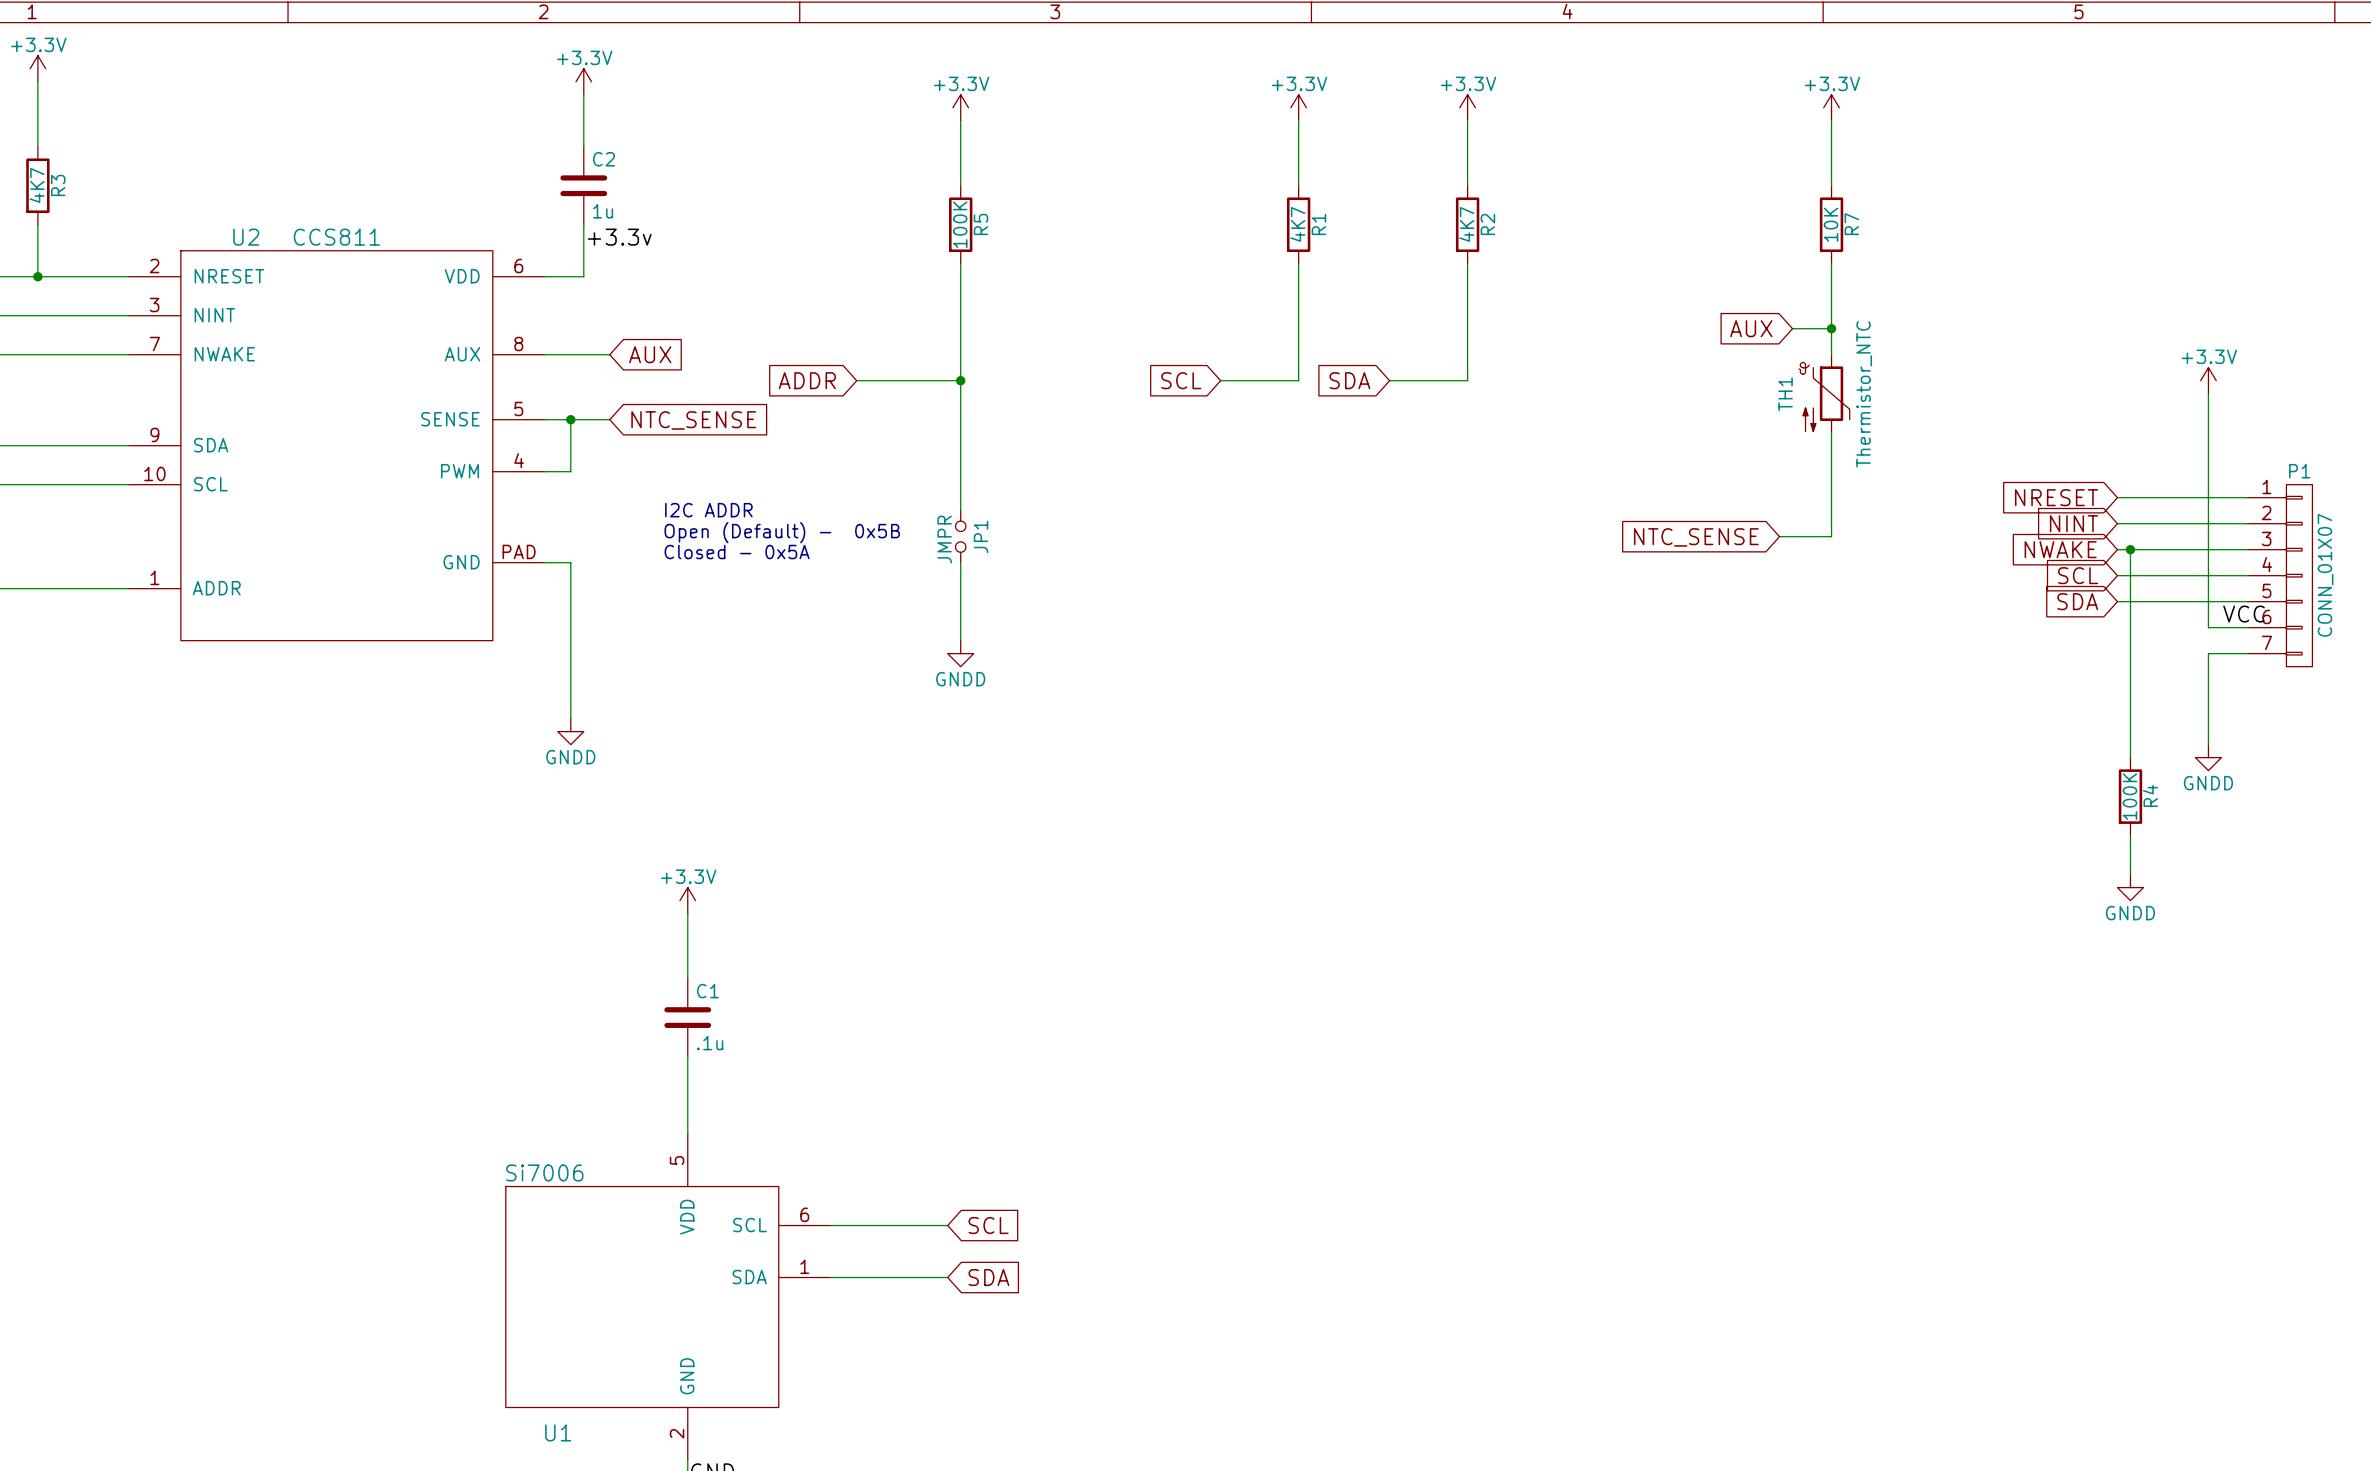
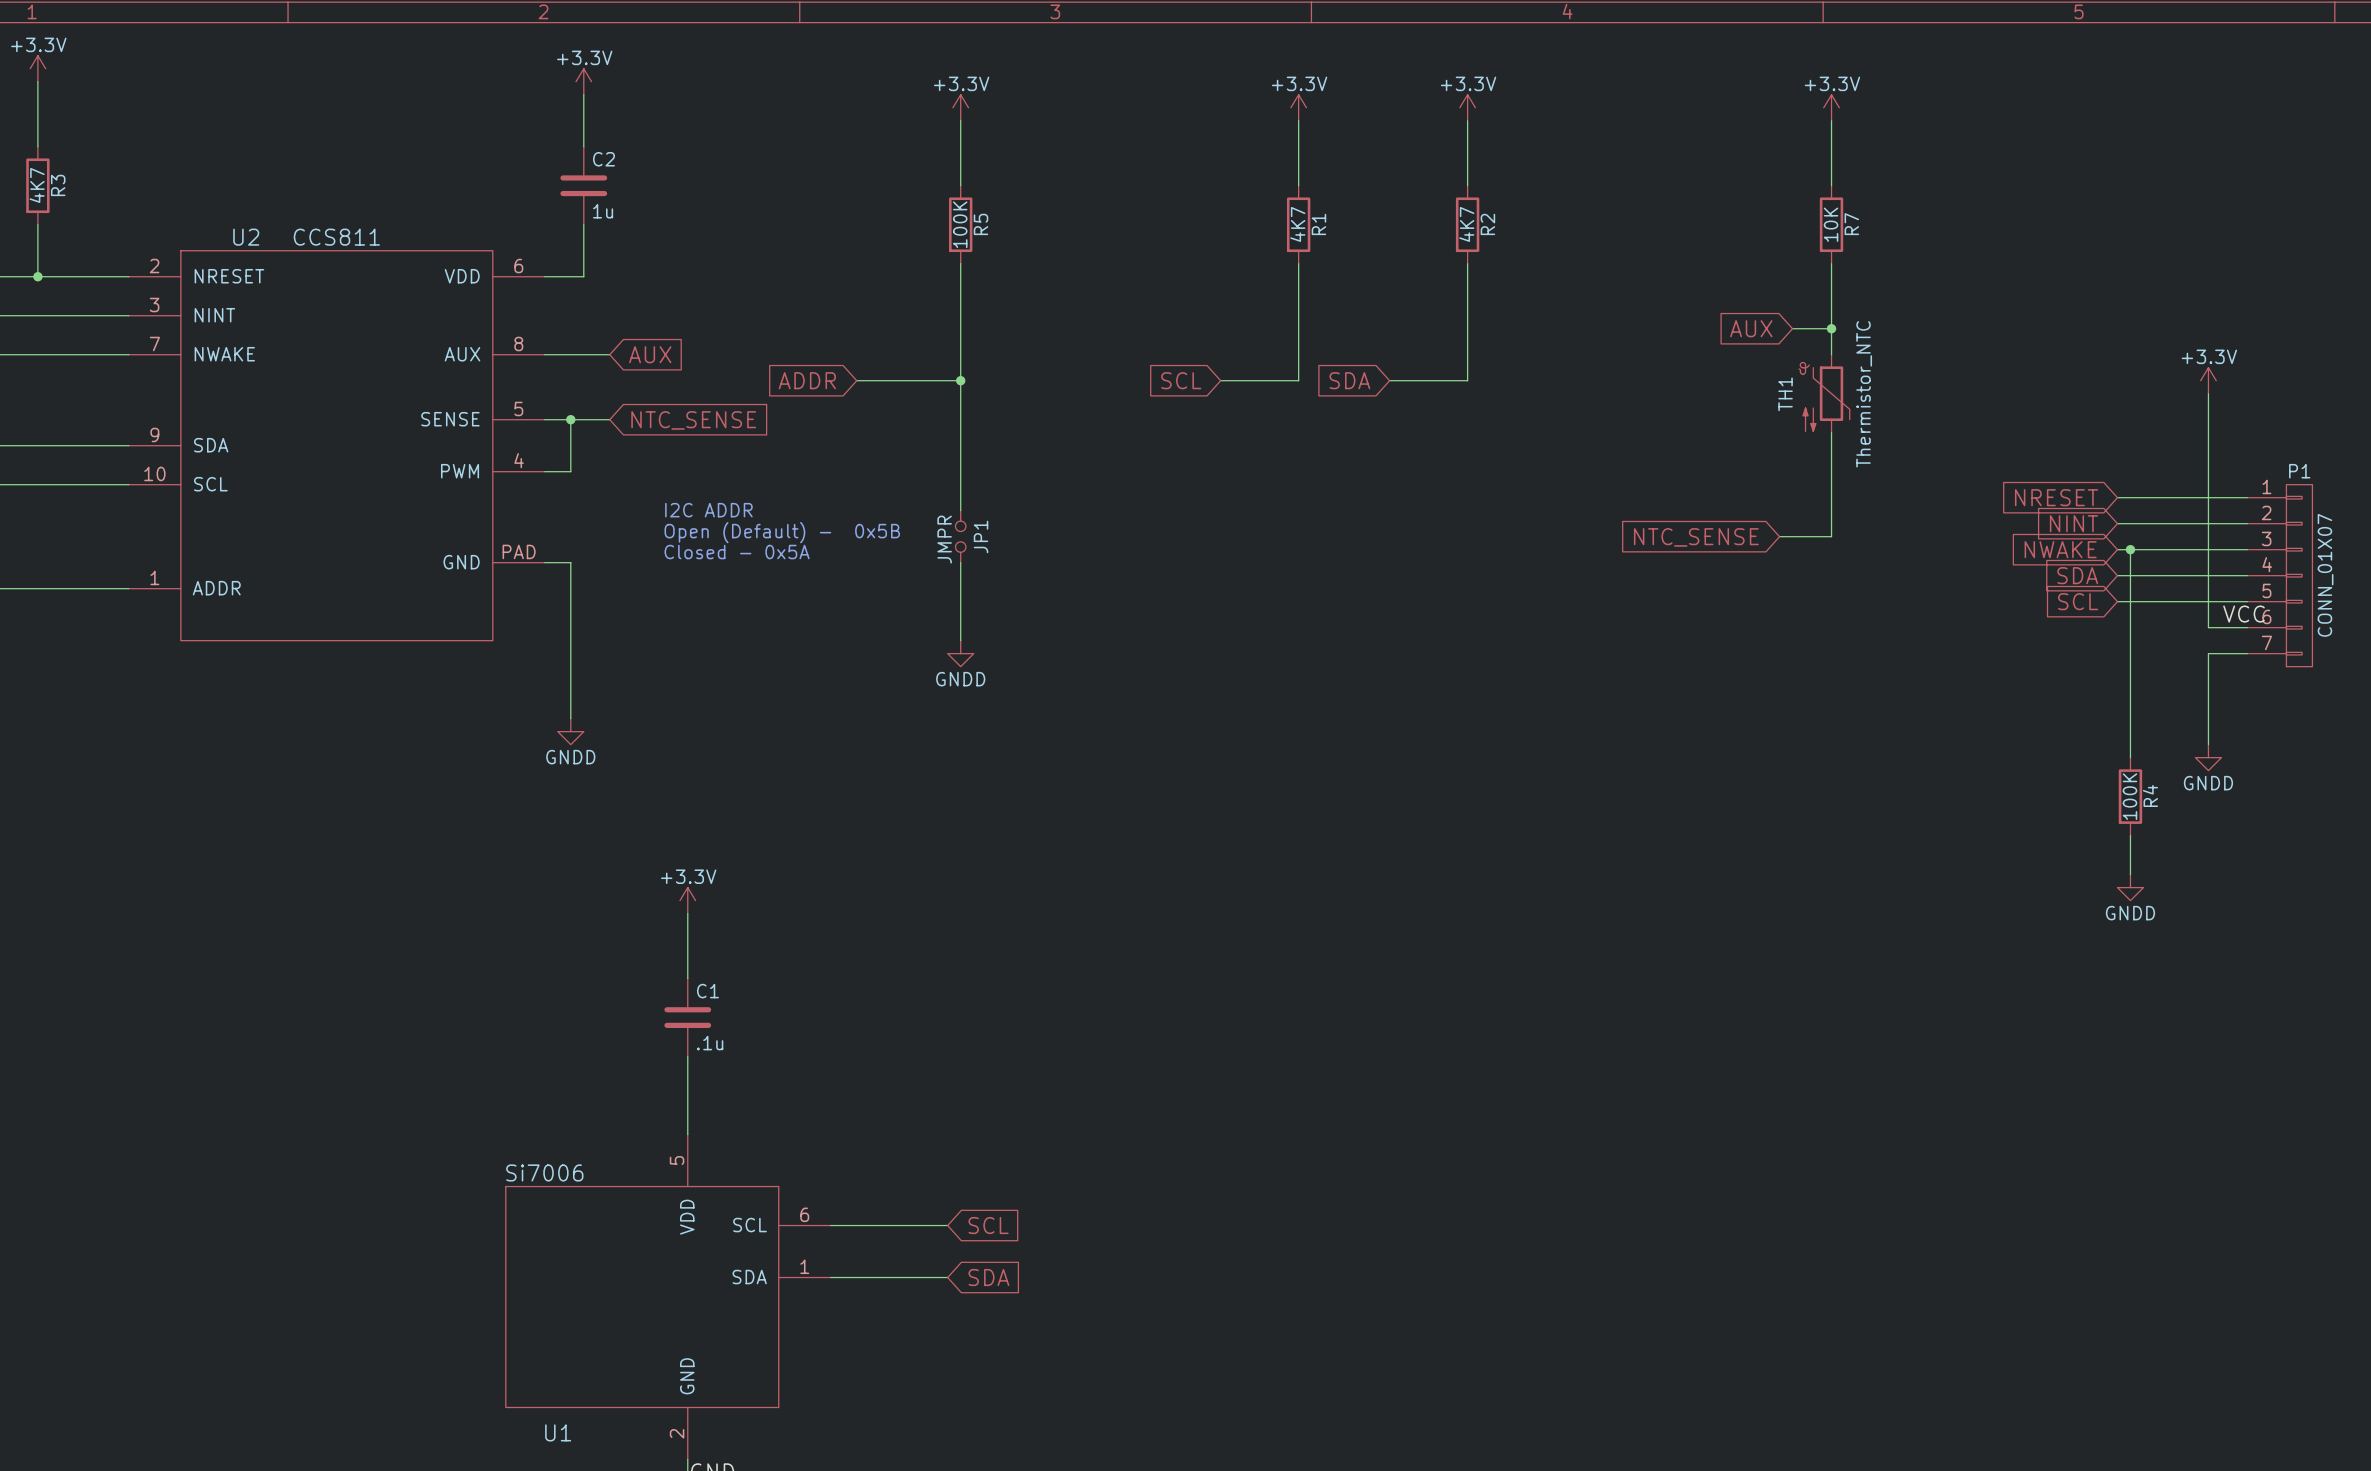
label: +3.3v (619, 237) -> none
global label: SCL (2078, 575) -> SDA (2077, 575)
global label: SDA (2077, 601) -> SCL (2078, 601)

